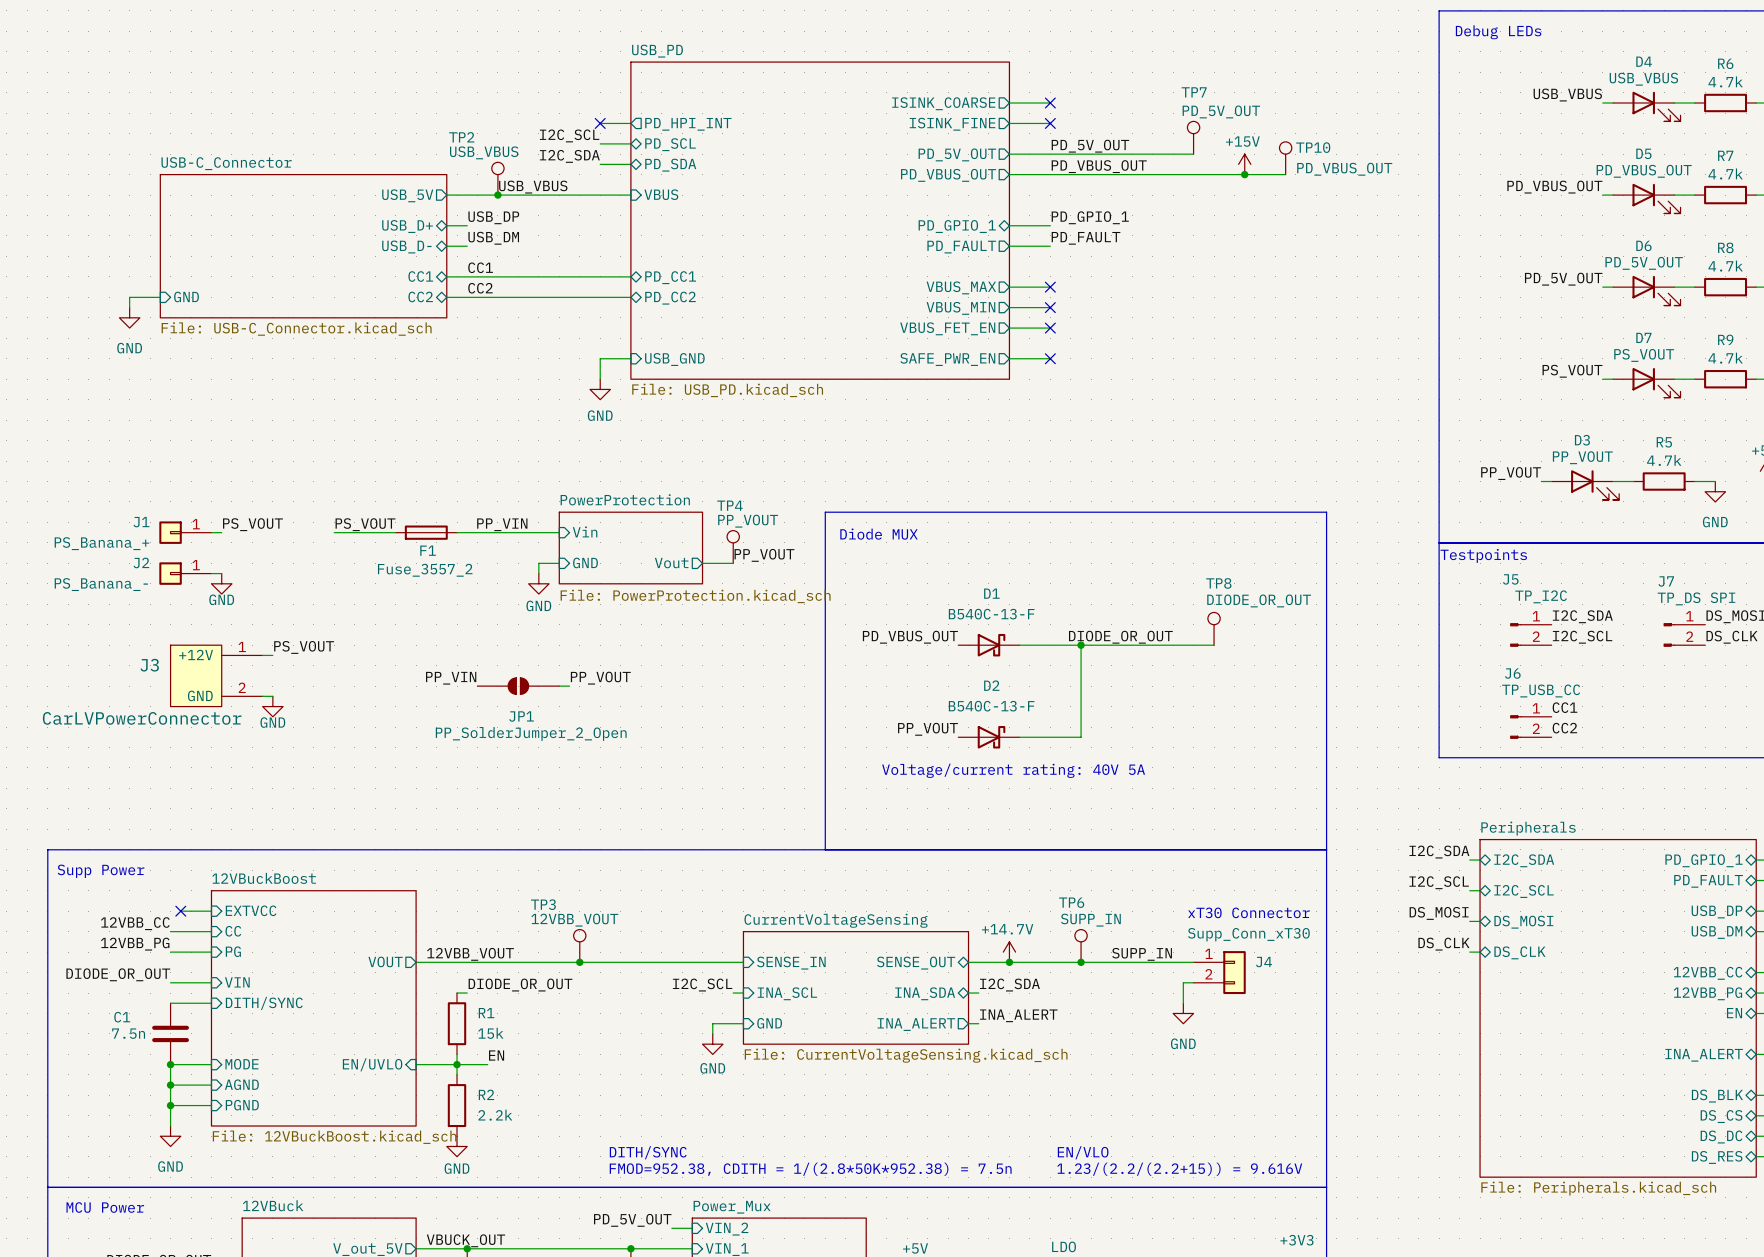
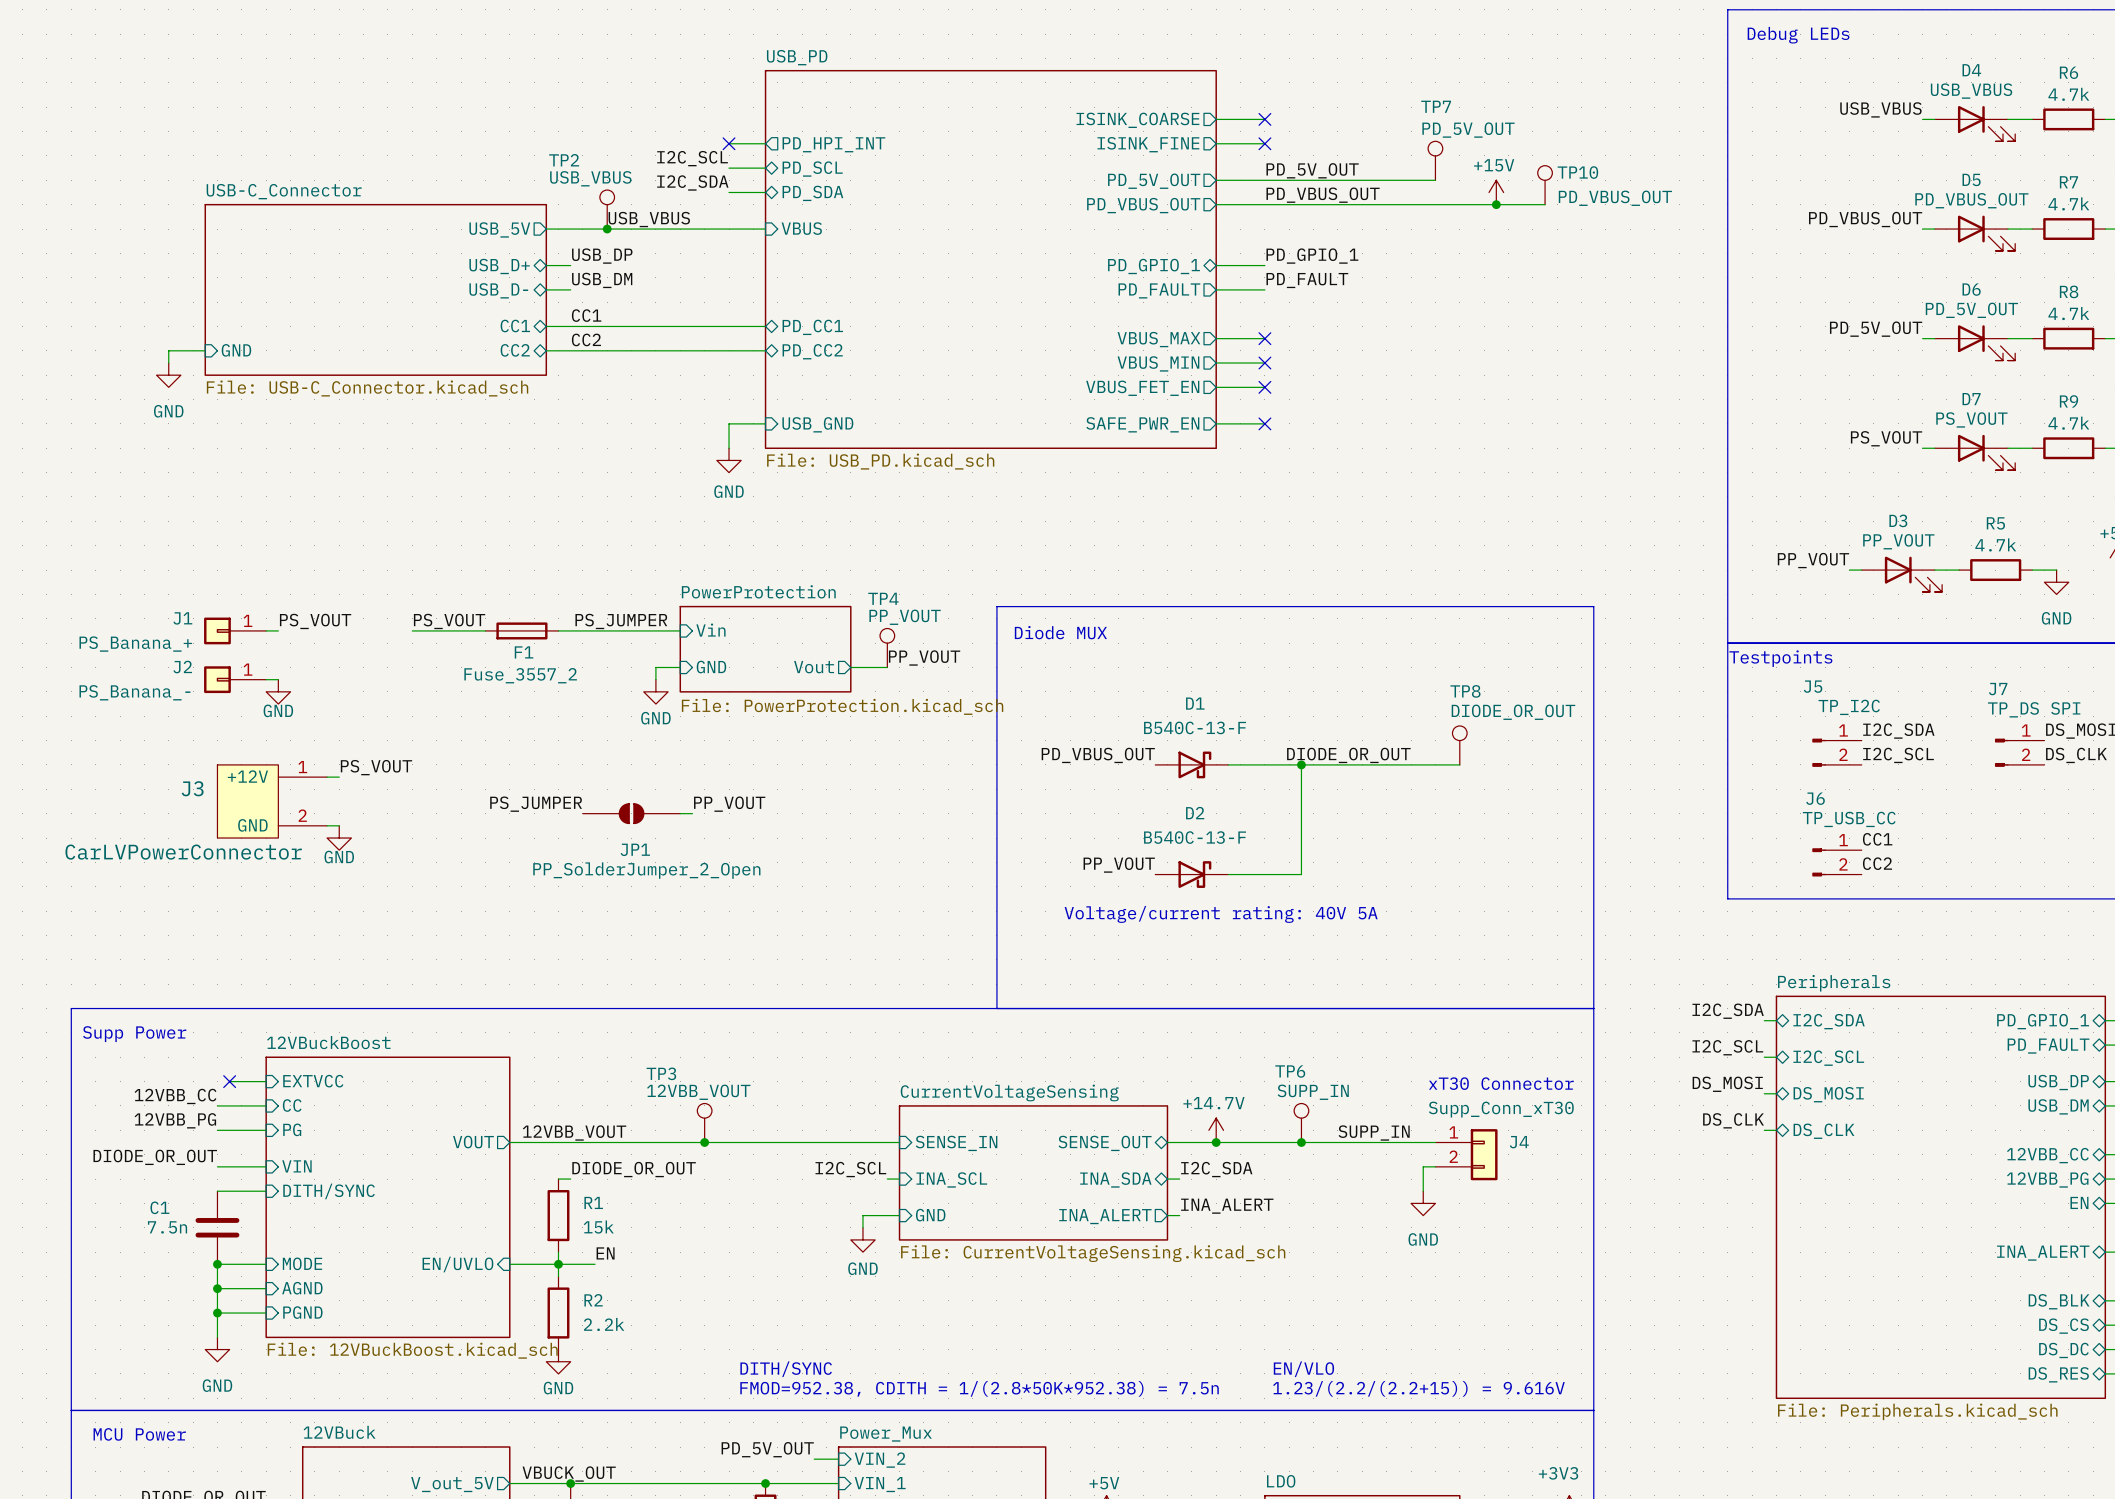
label: PP_VIN (502, 524) -> none
label: none -> PS_JUMPER (621, 621)
label: PP_VIN (451, 678) -> PS_JUMPER (536, 804)

